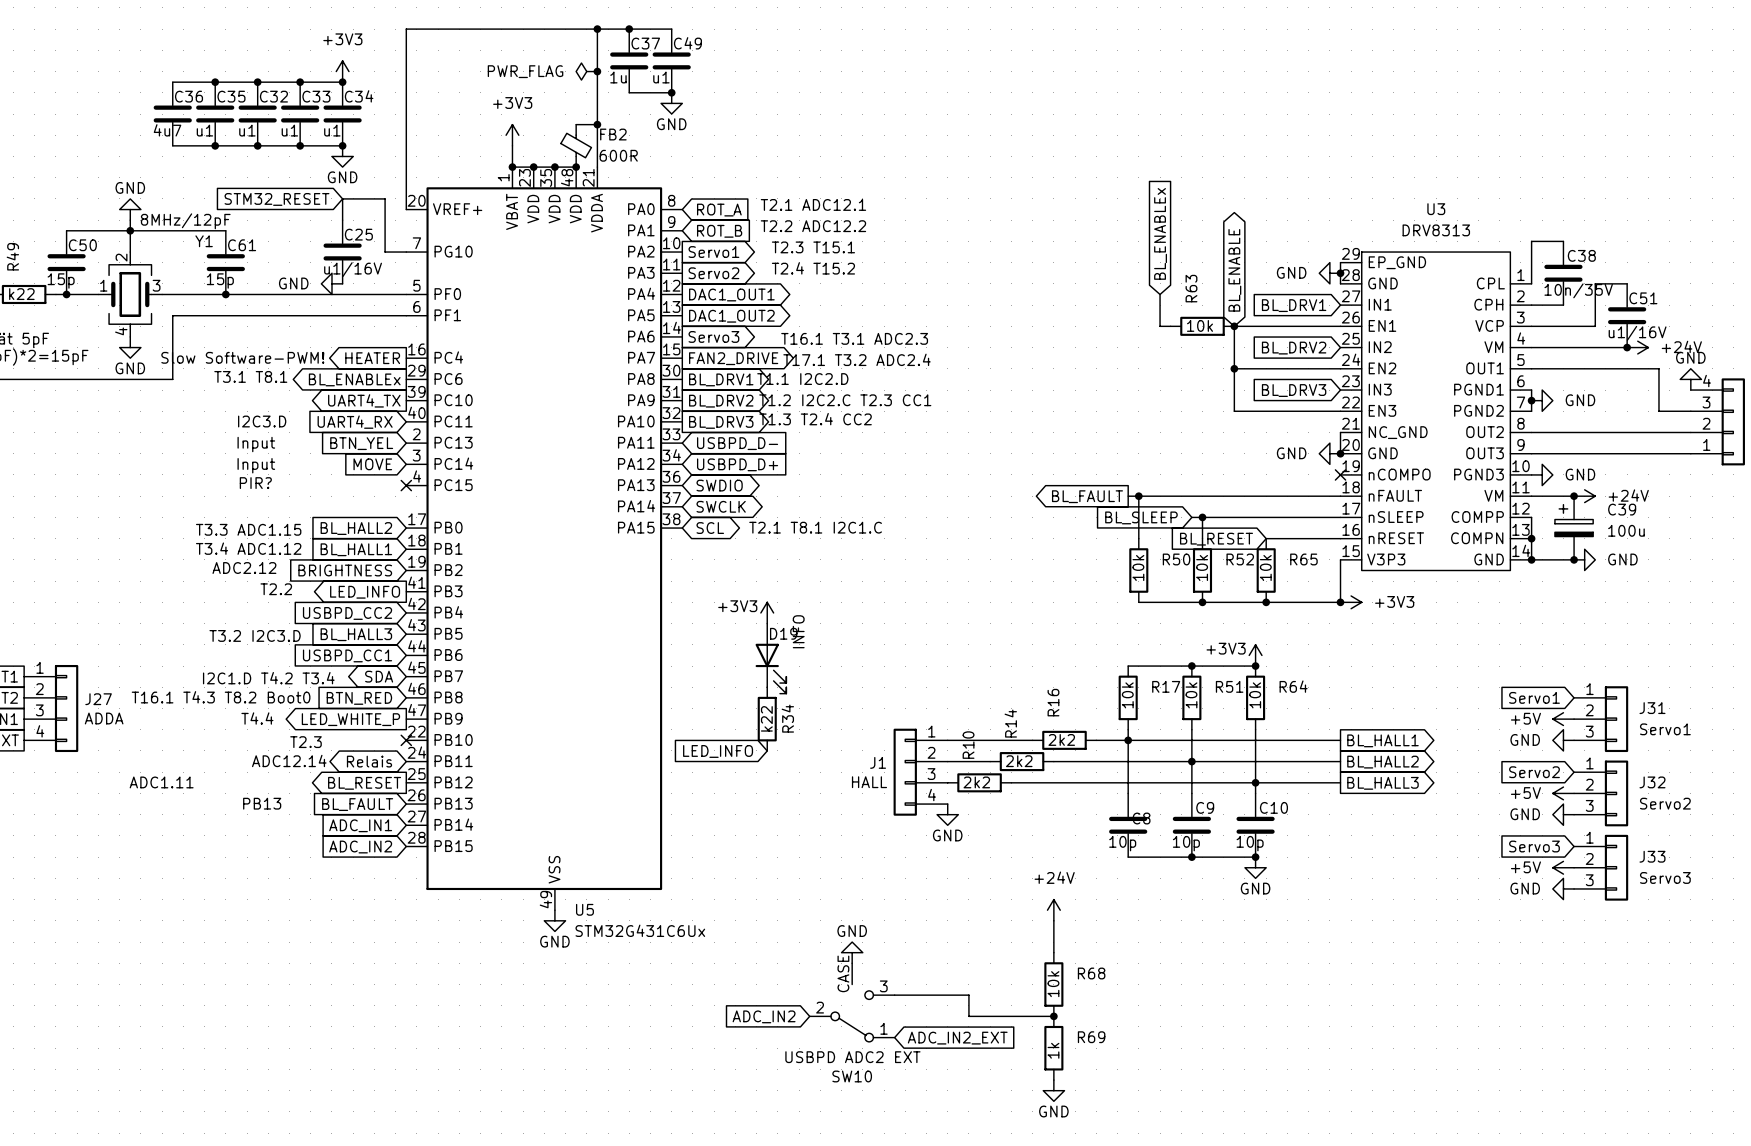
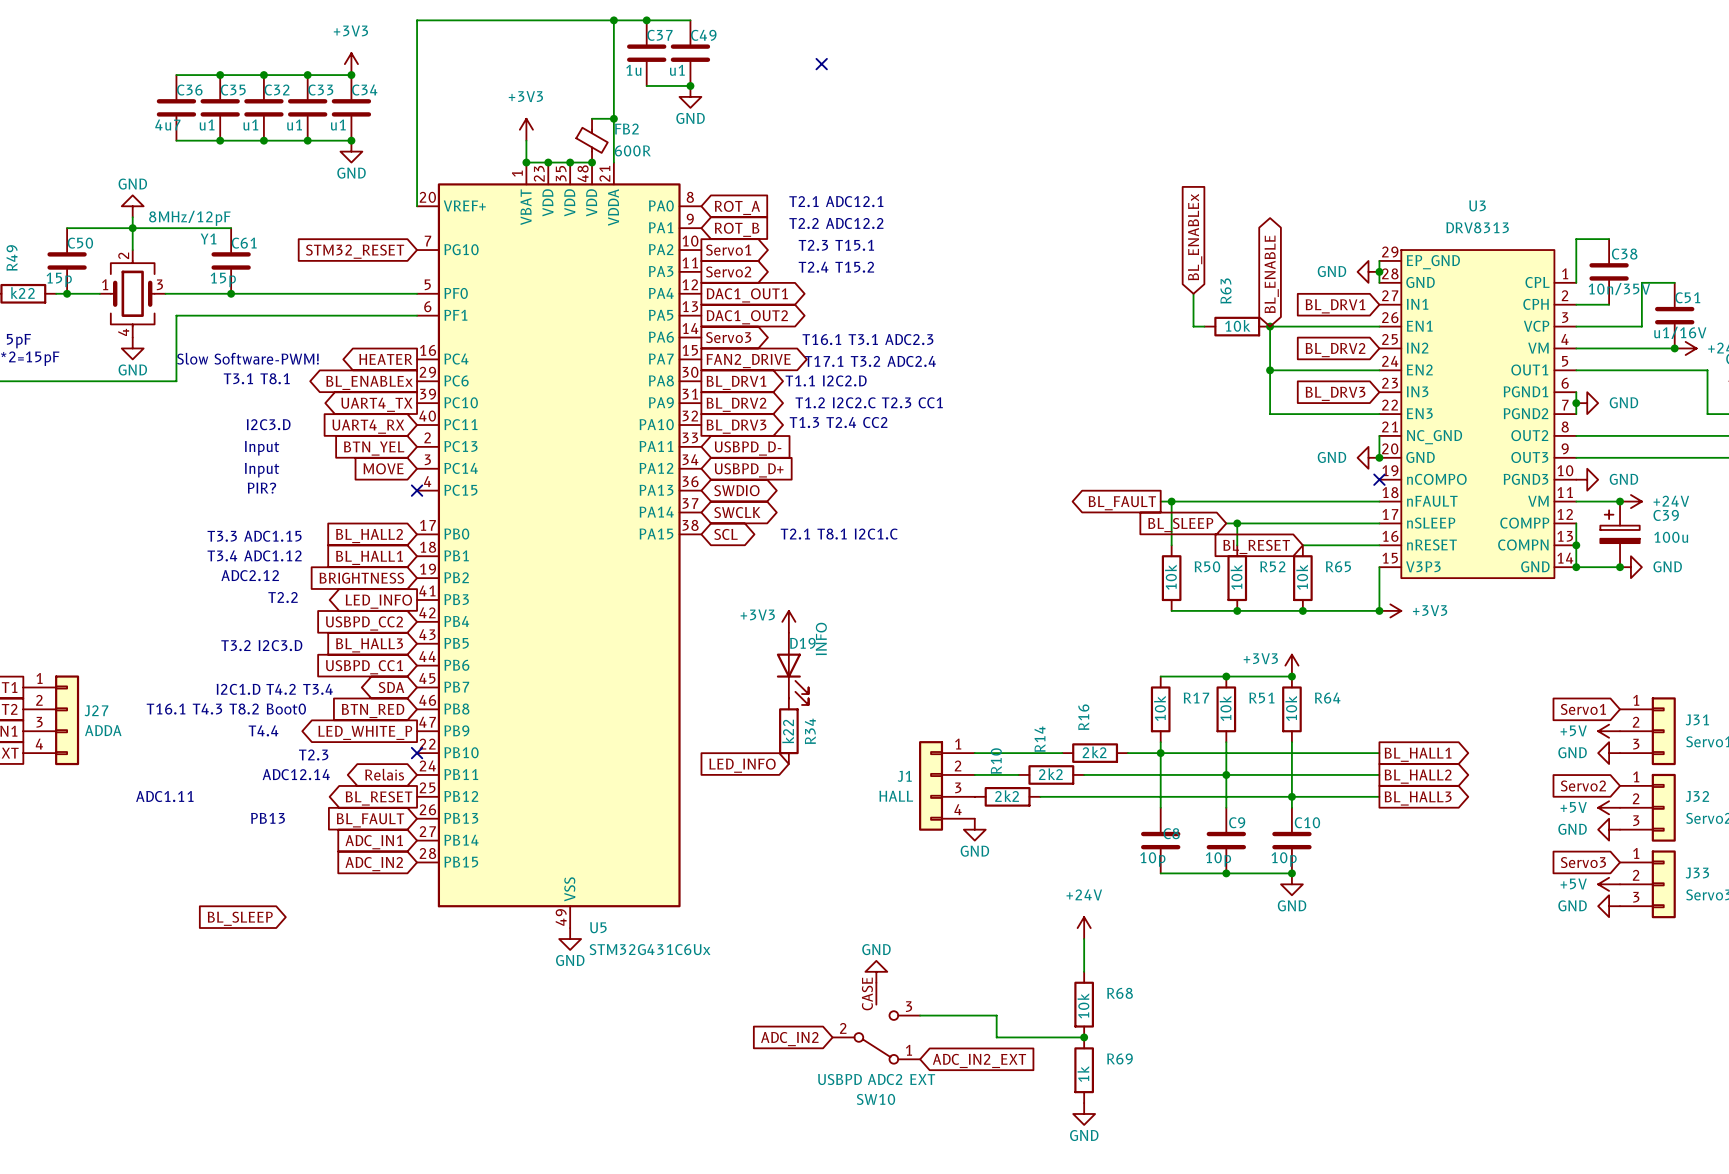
power symbol: PWR_FLAG (586, 71) -> none
junction: (597, 71) -> none
no-connect mark: none -> (821, 64)
global label position: STM32_RESET (277, 199) -> STM32_RESET (355, 251)
wire: (342, 220) (342, 198) (385, 198) (385, 252) (406, 252) -> none
C25: u1/16V (342, 252) -> none
power symbol: GND (331, 283) -> none
global label: none -> BL_SLEEP (240, 918)

